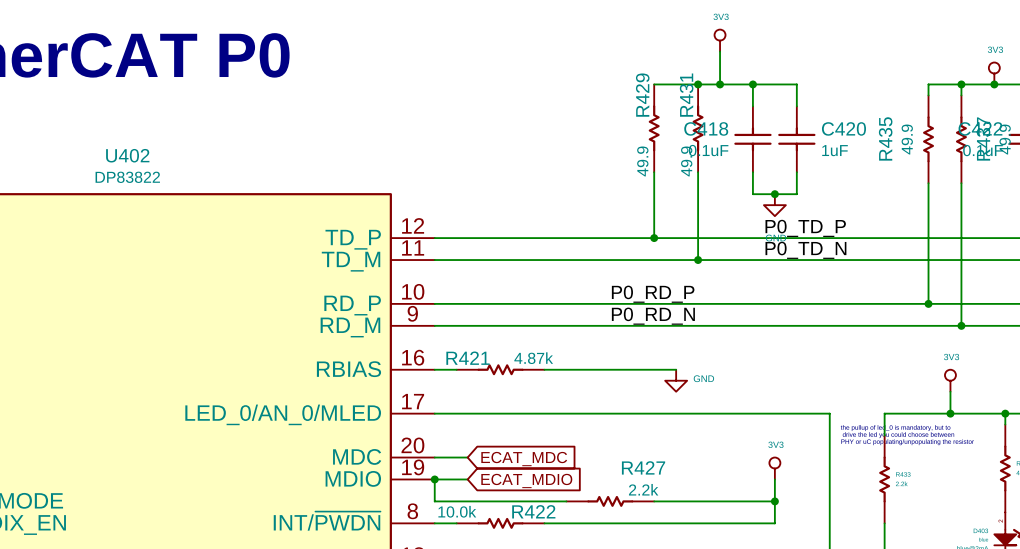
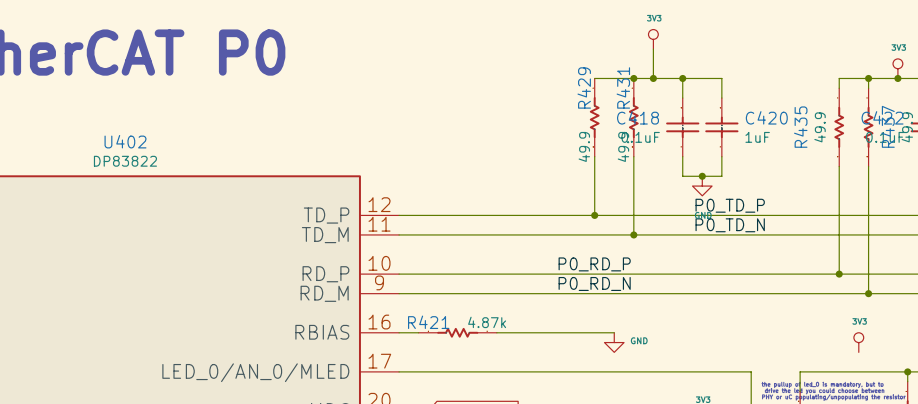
wire: (950, 391) (950, 413) -> none
junction: (950, 413) -> none

